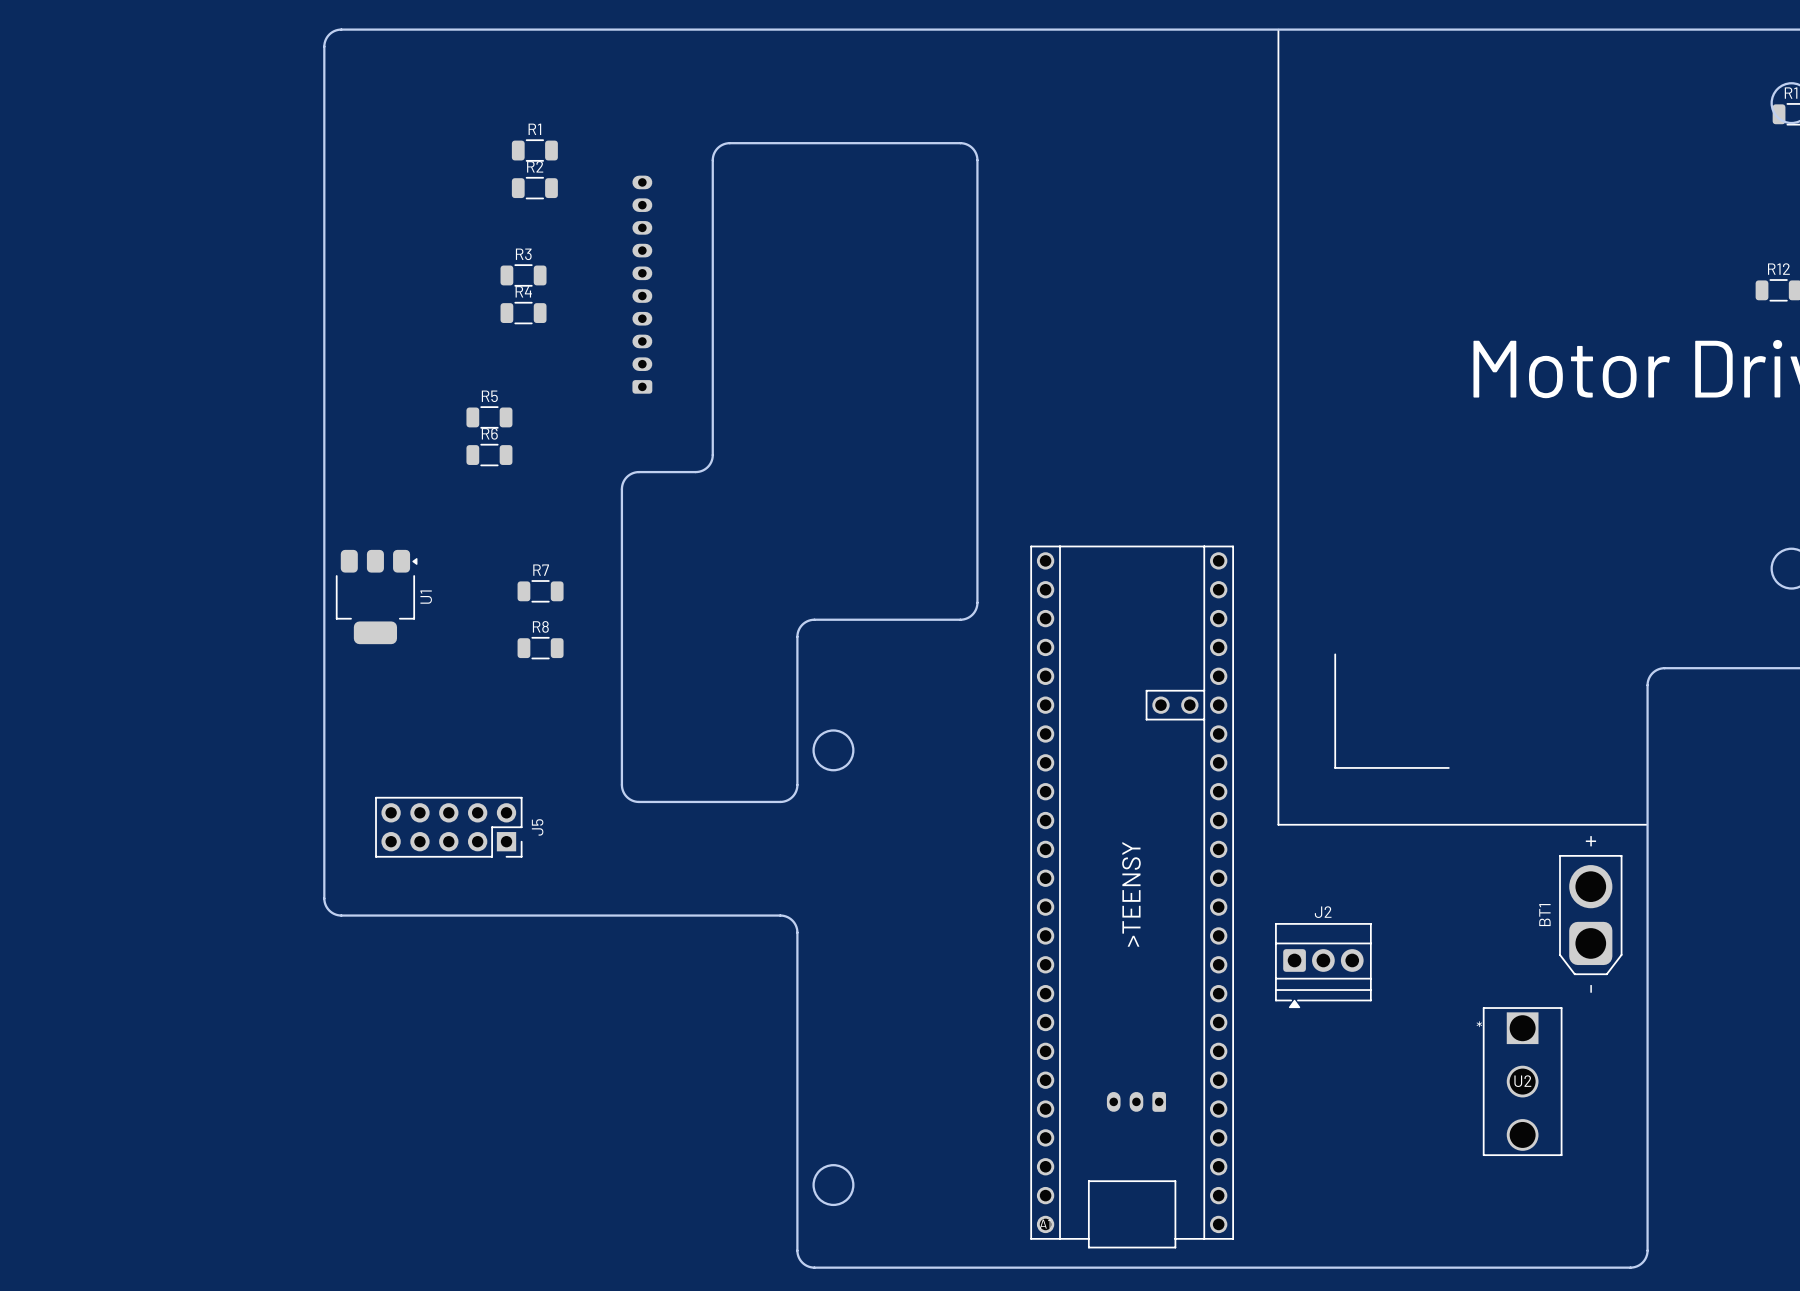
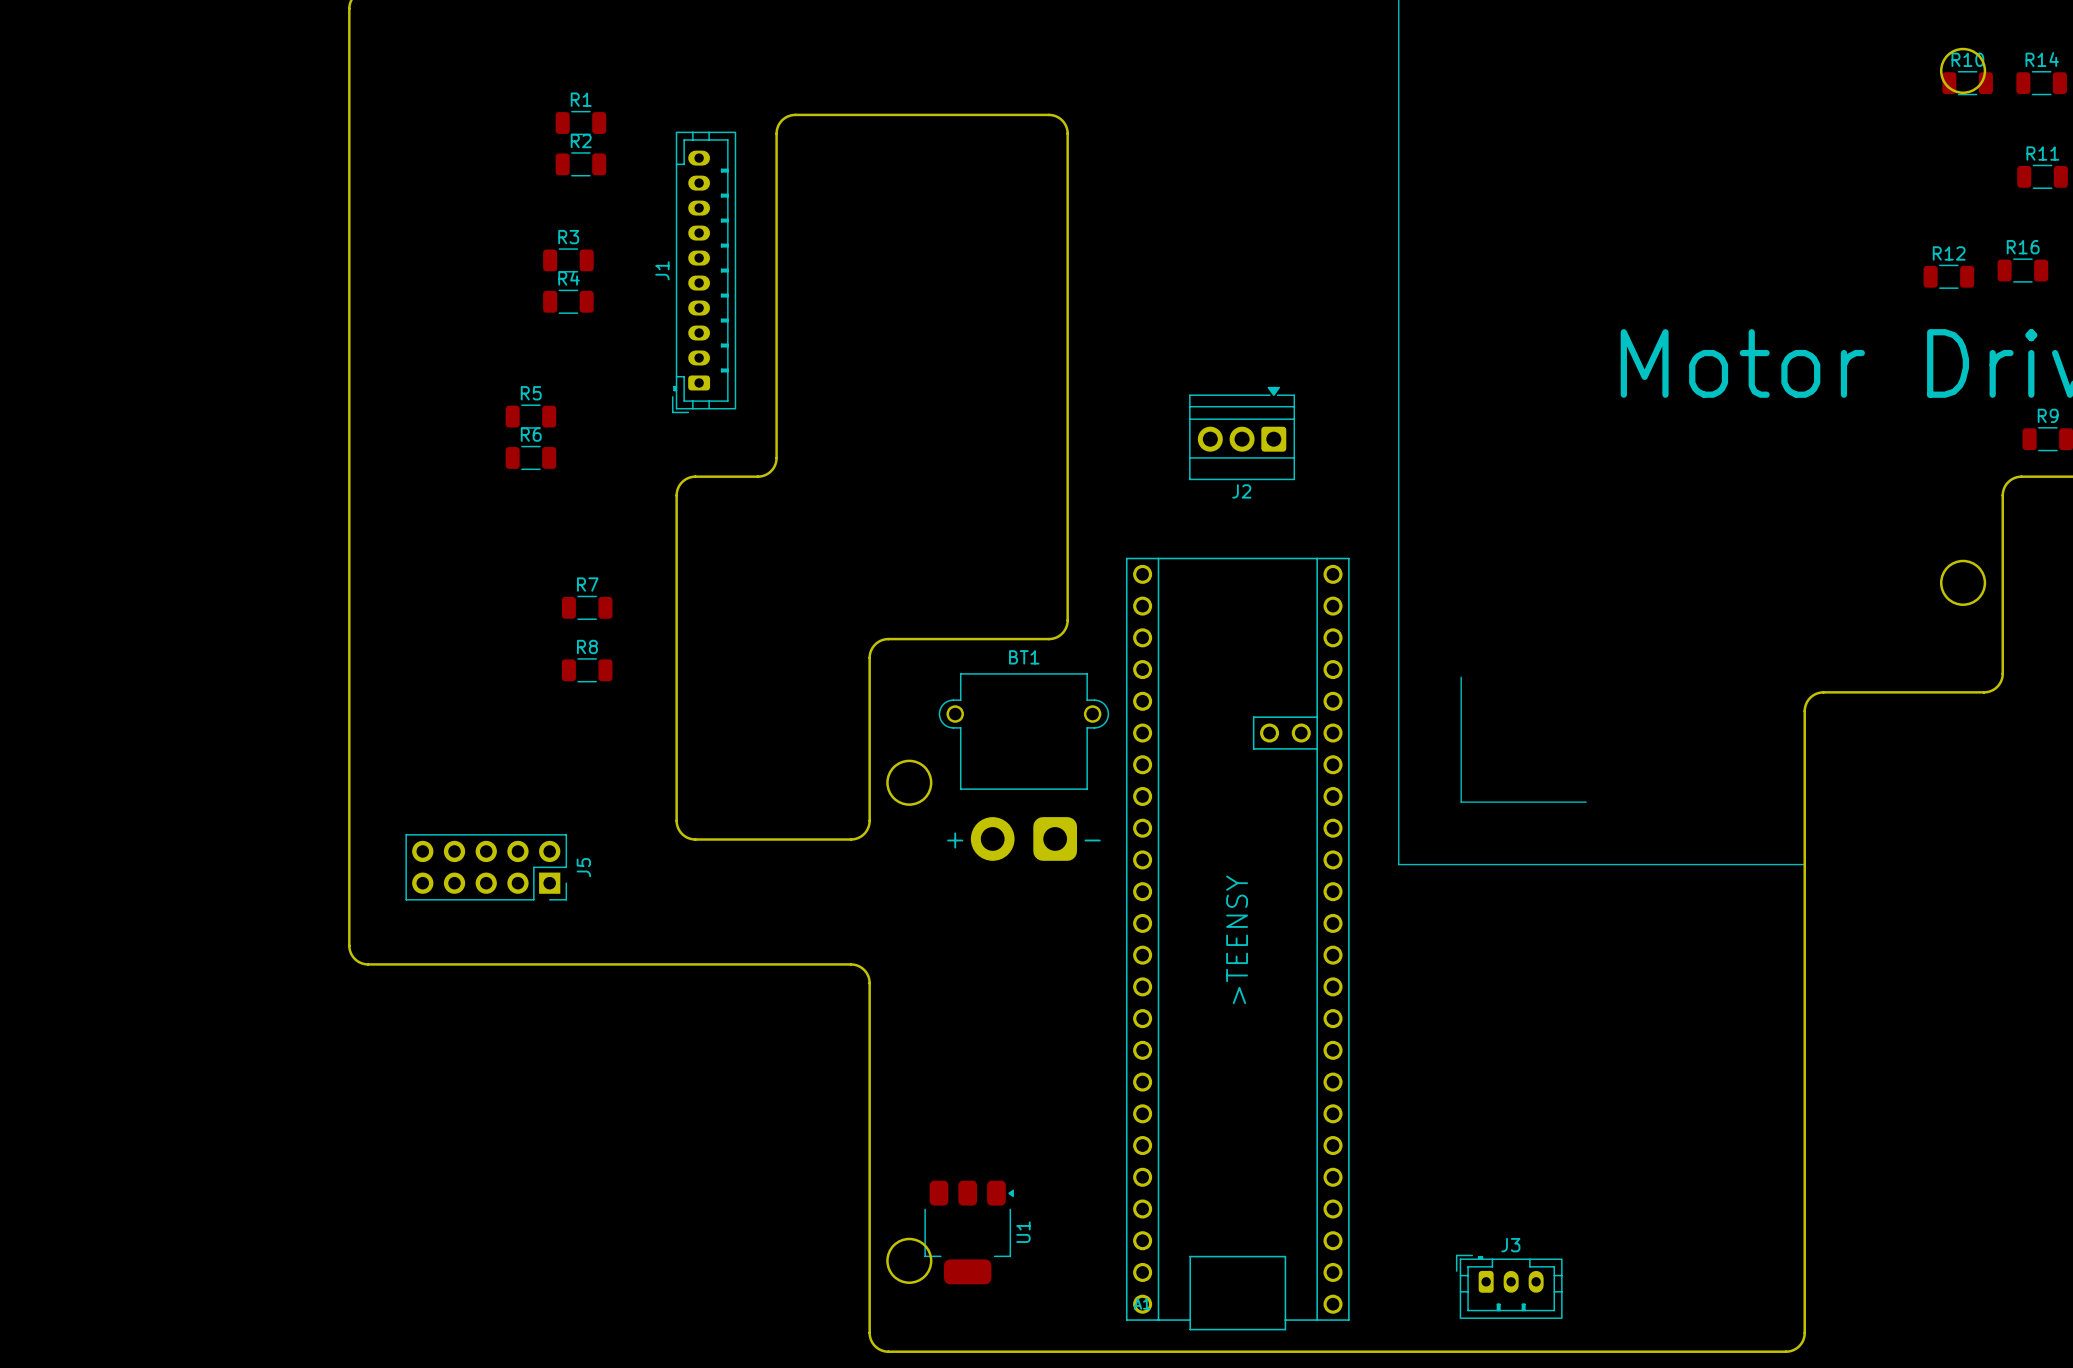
J1 side: bottom (642, 284) -> top (704, 272)
U1 position: (376, 597) -> (969, 1232)
BT1 footprint: [1559, 855, 1623, 975] -> [938, 673, 1110, 861]
BT1 name position: BT1 (1544, 915) -> BT1 (1024, 657)
J2 rotation: 0° (1323, 965) -> 180° (1242, 433)
J2 position: (1323, 965) -> (1242, 433)
U2: (1522, 1081) -> none
J3 side: bottom (1136, 1101) -> top (1509, 1286)

